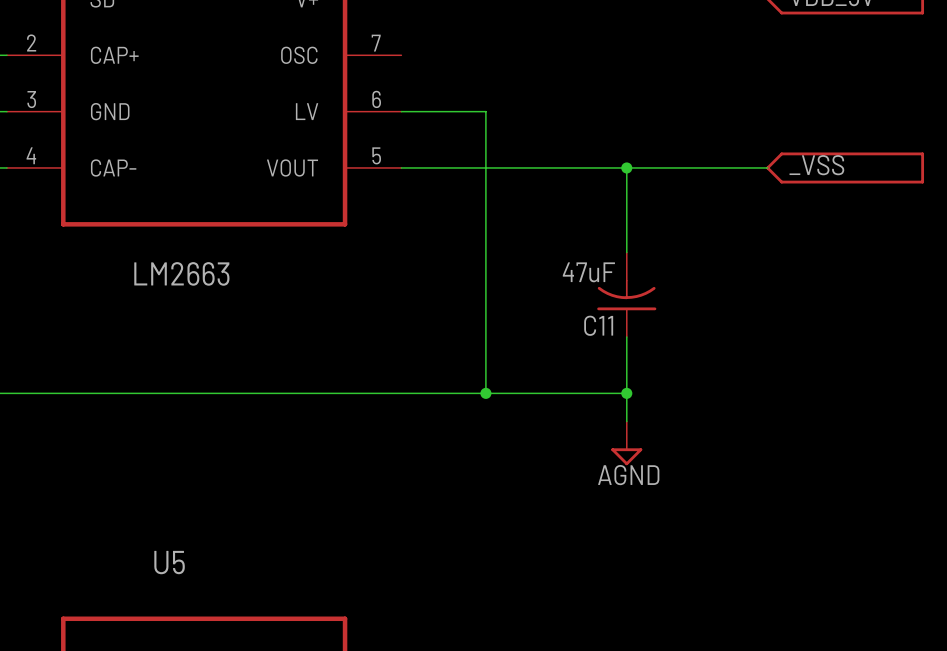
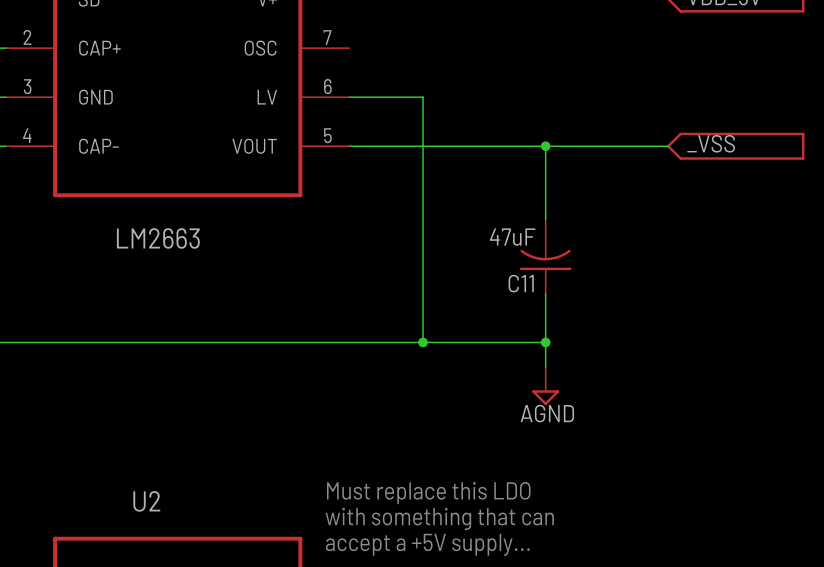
U5 name: U5 (169, 562) -> U2 (146, 501)
text: none -> Must replace this LDO (428, 493)
text: none -> with something that can (439, 518)
text: none -> accept a +5V supply... (427, 544)

